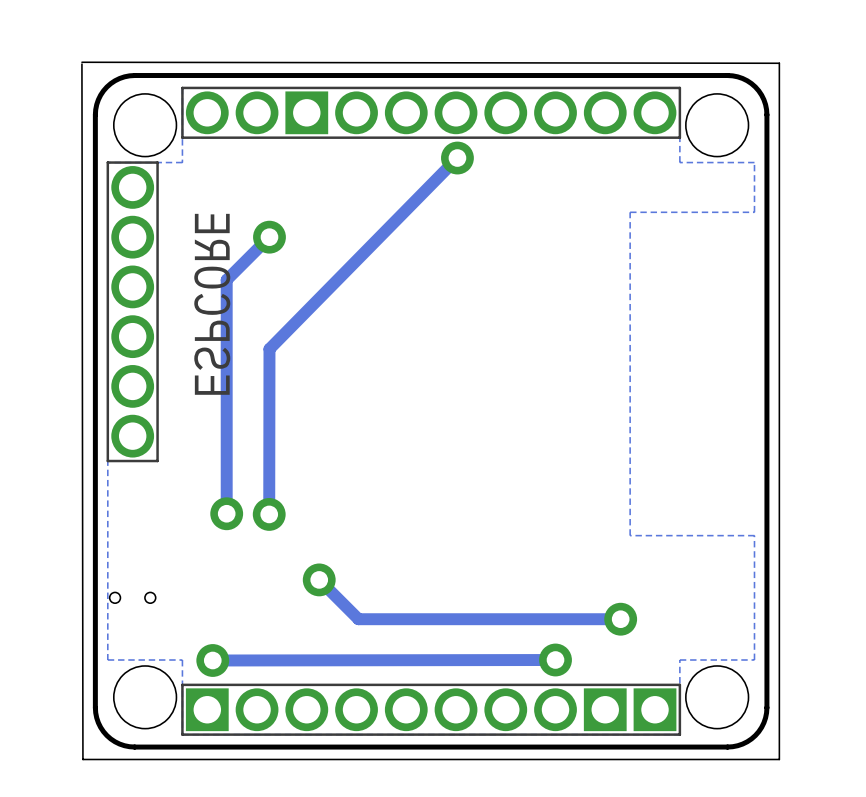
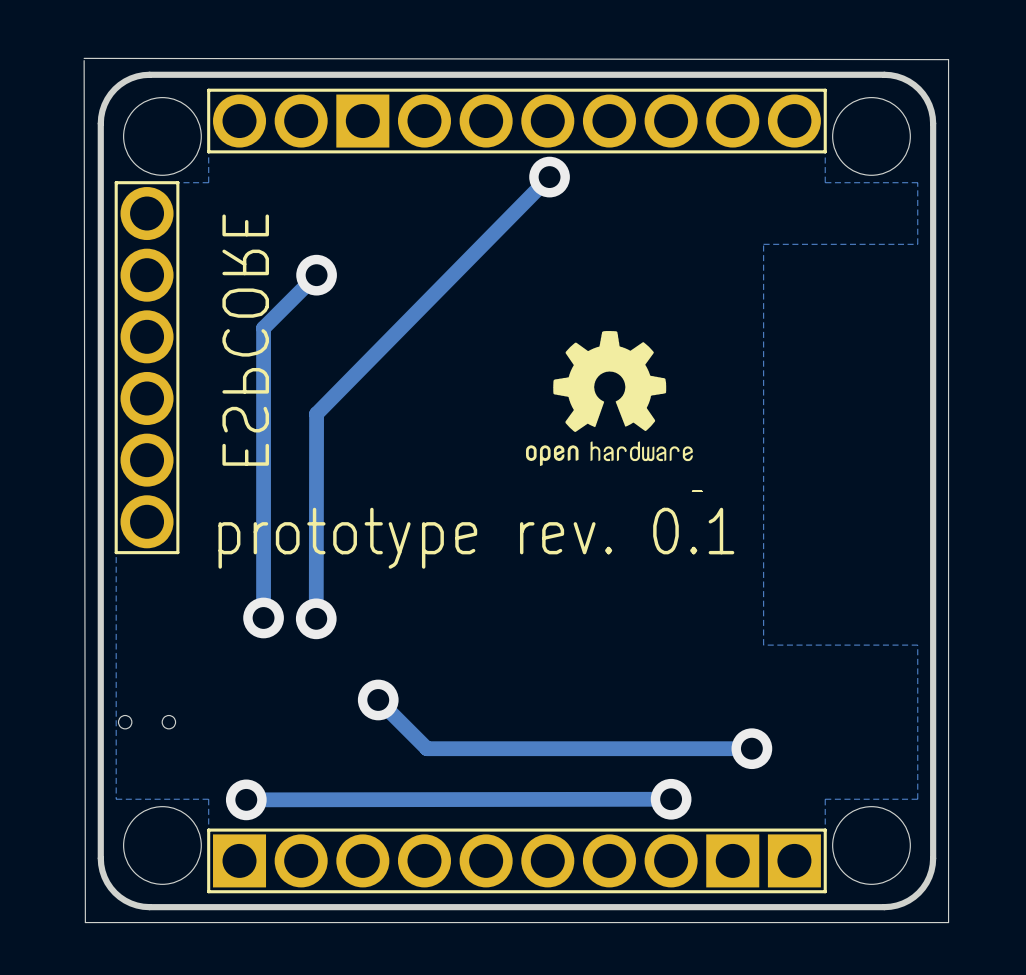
drawing: none -> [525, 331, 693, 466]
text: none -> prototype rev. 0.1 (476, 538)

